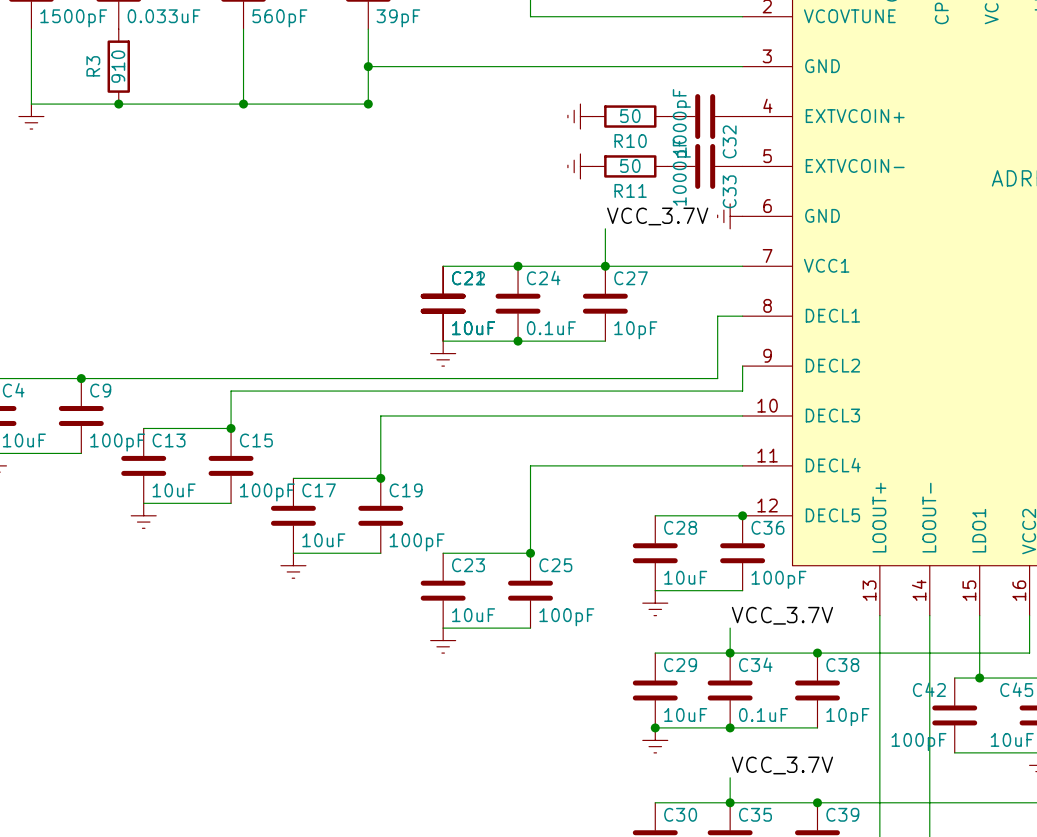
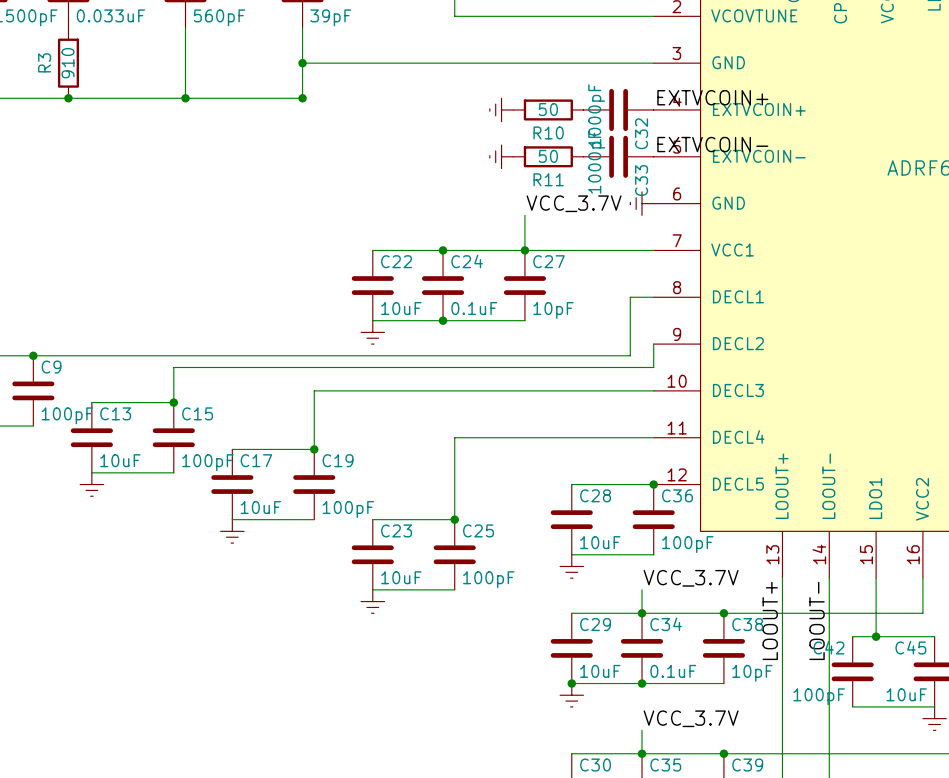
label: none -> EXTVCOIN+ (712, 97)
label: none -> EXTVCOIN- (712, 144)
part: 10uF (443, 303) -> none
label: none -> LOOUT+ (770, 620)
label: none -> LOOUT- (817, 620)

